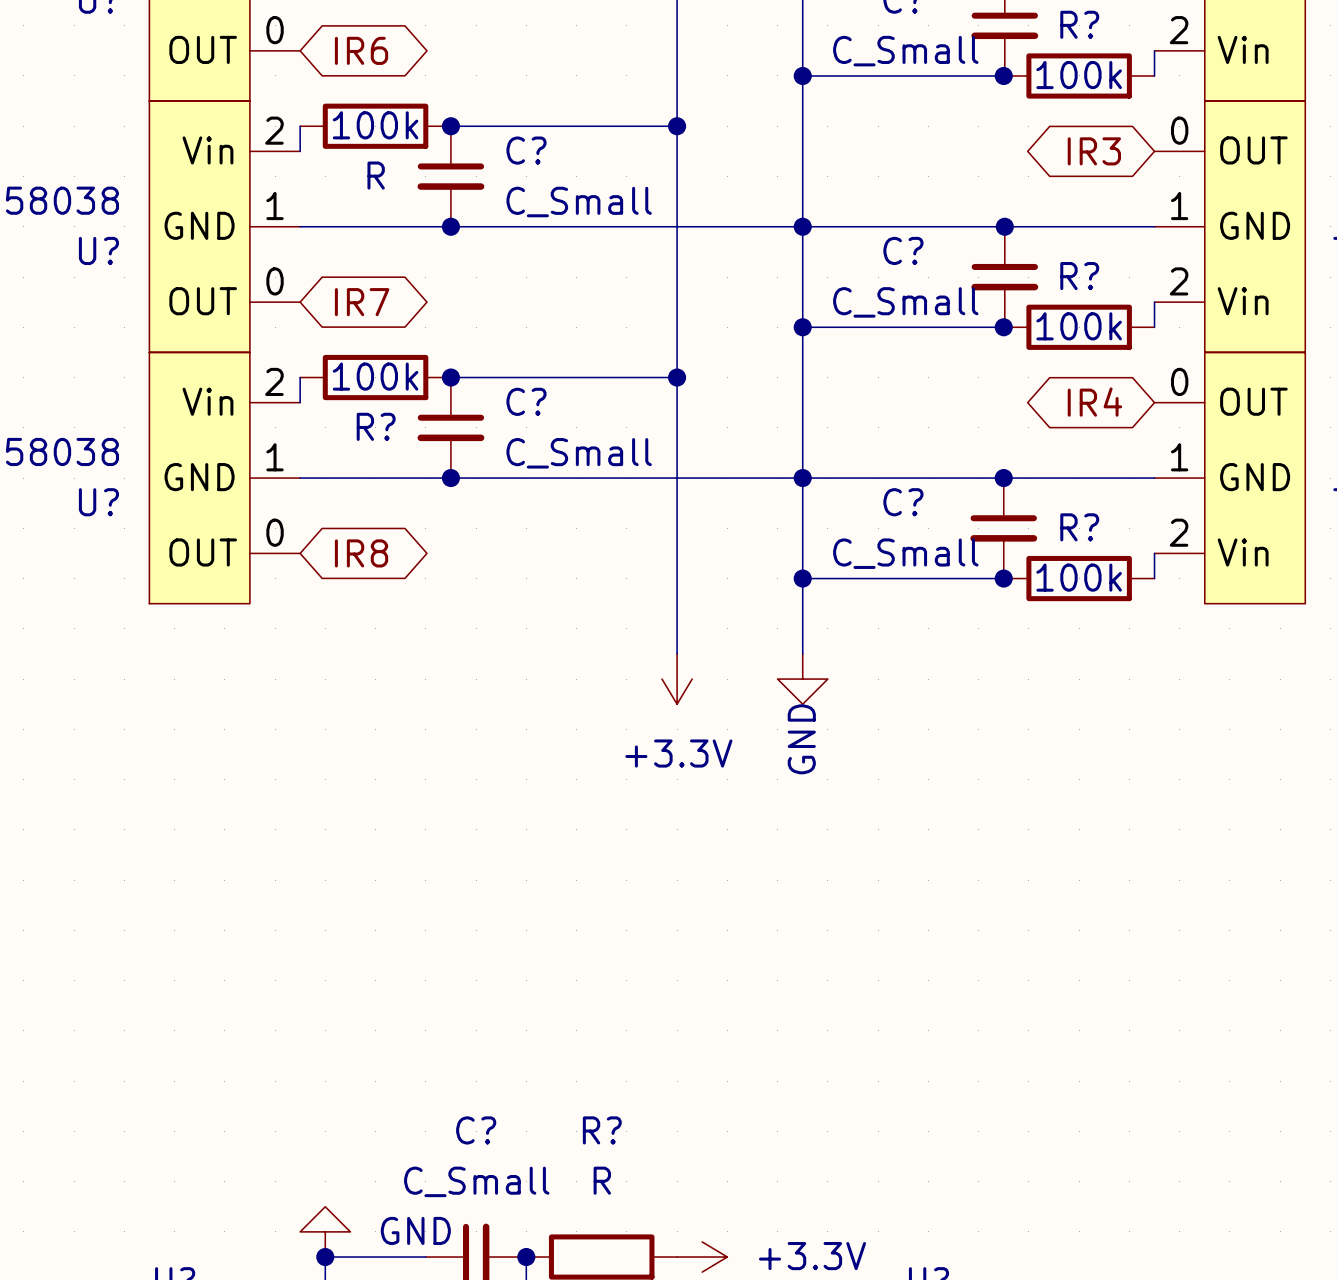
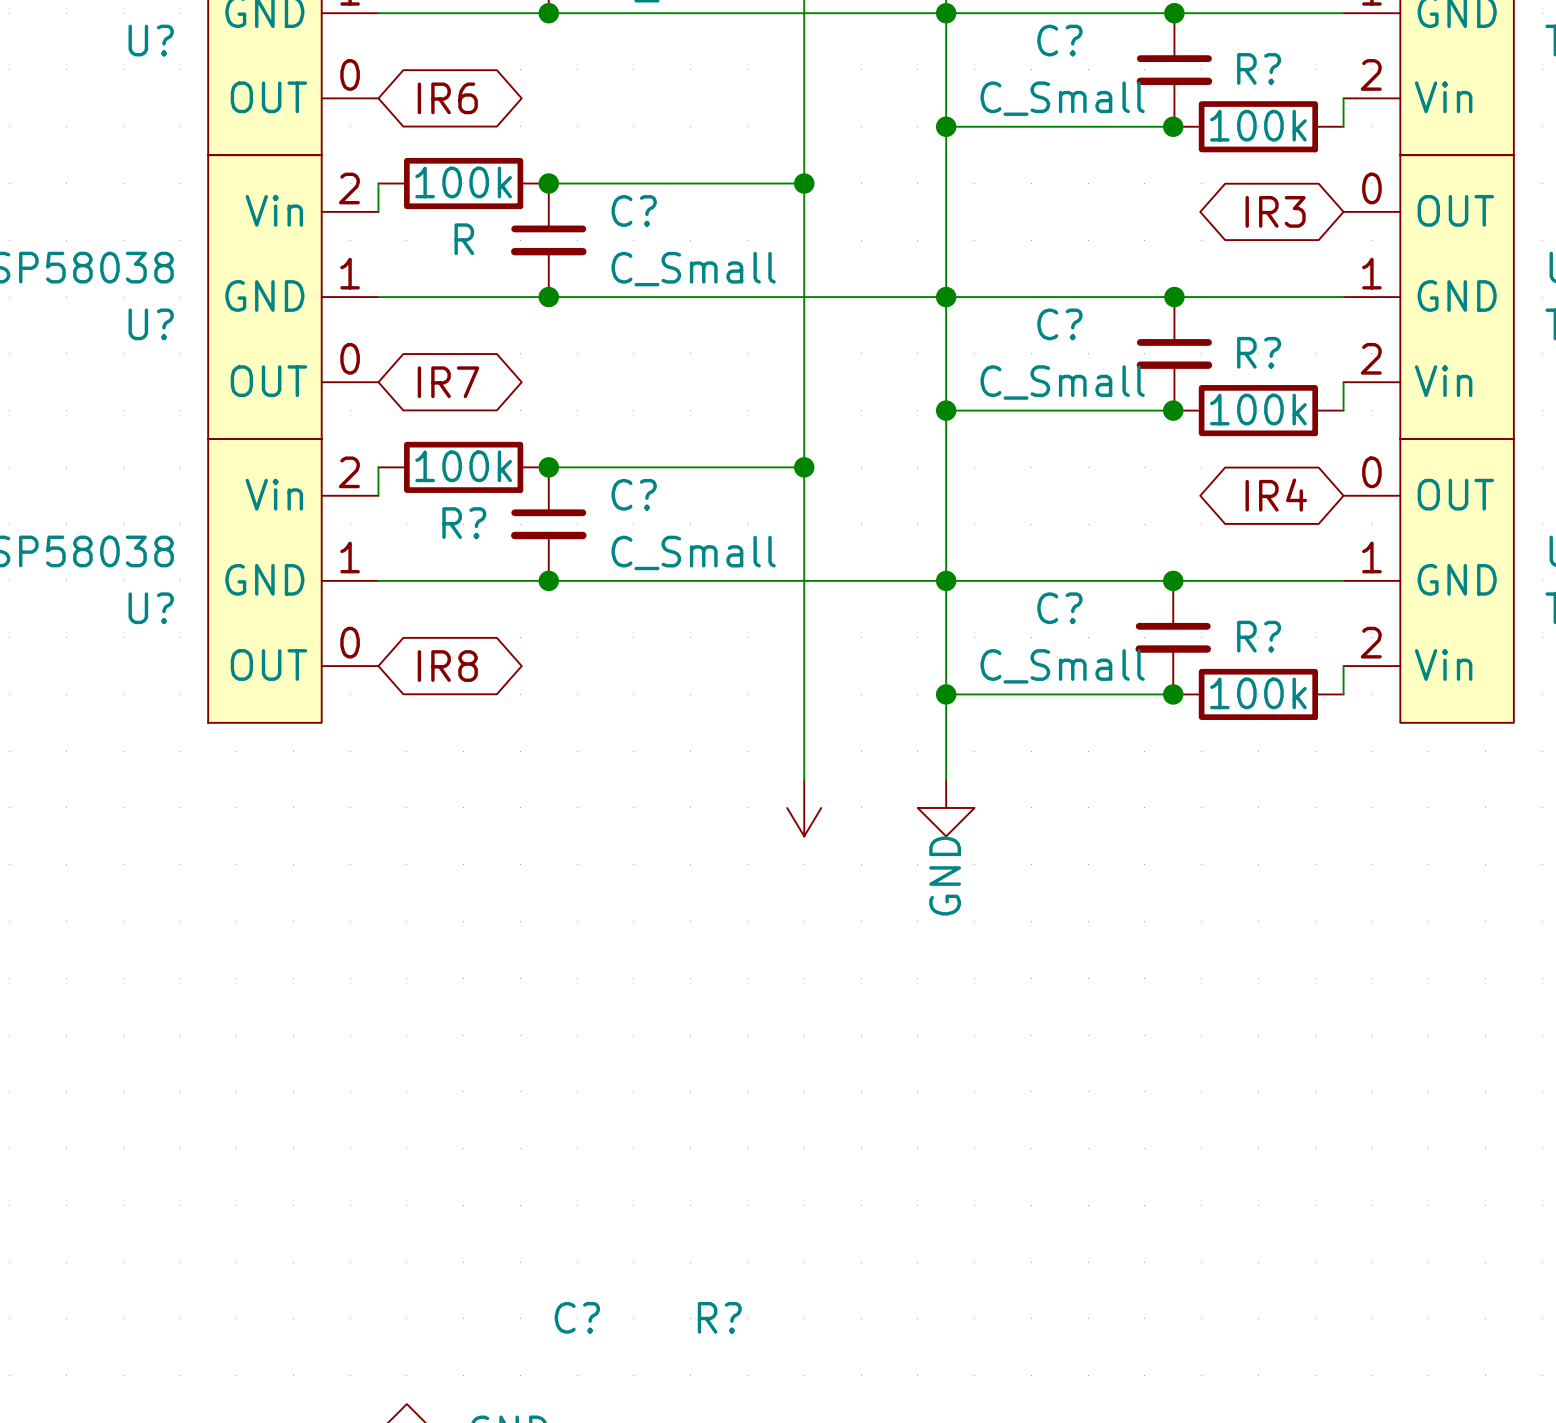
power symbol text: +3.3V (678, 753) -> none
R? value: R (602, 1180) -> none
C? value: C_Small (476, 1181) -> none

